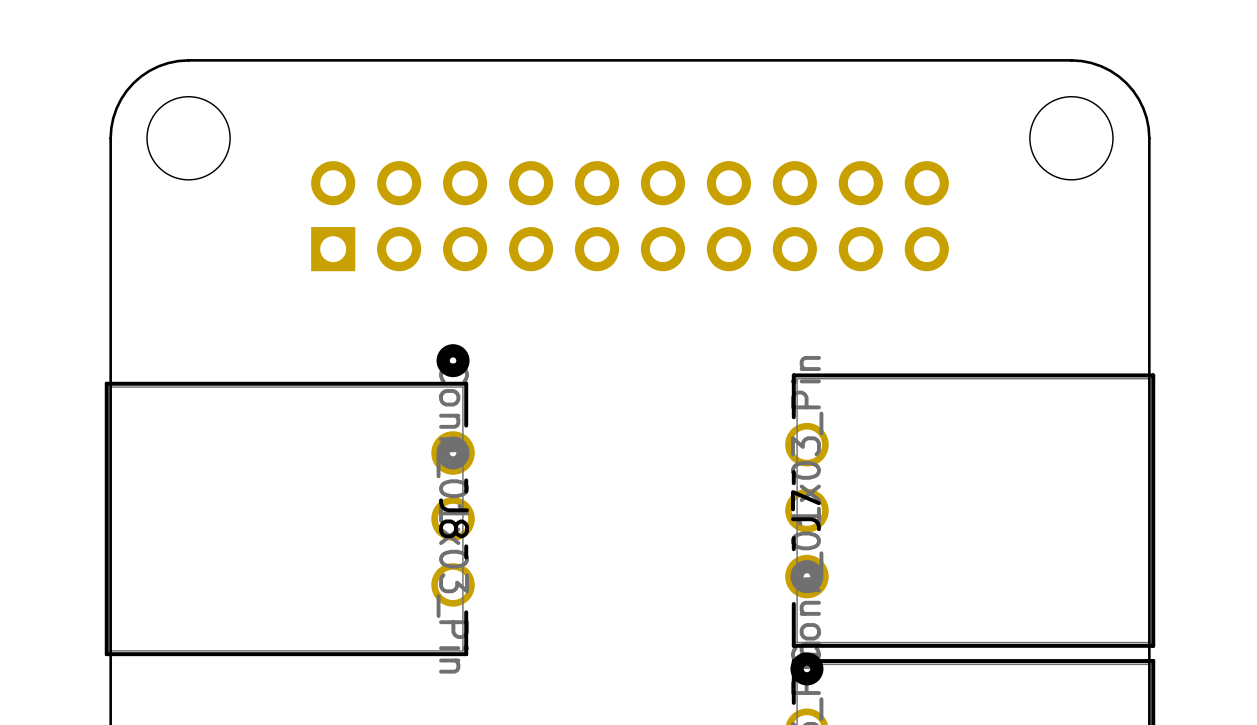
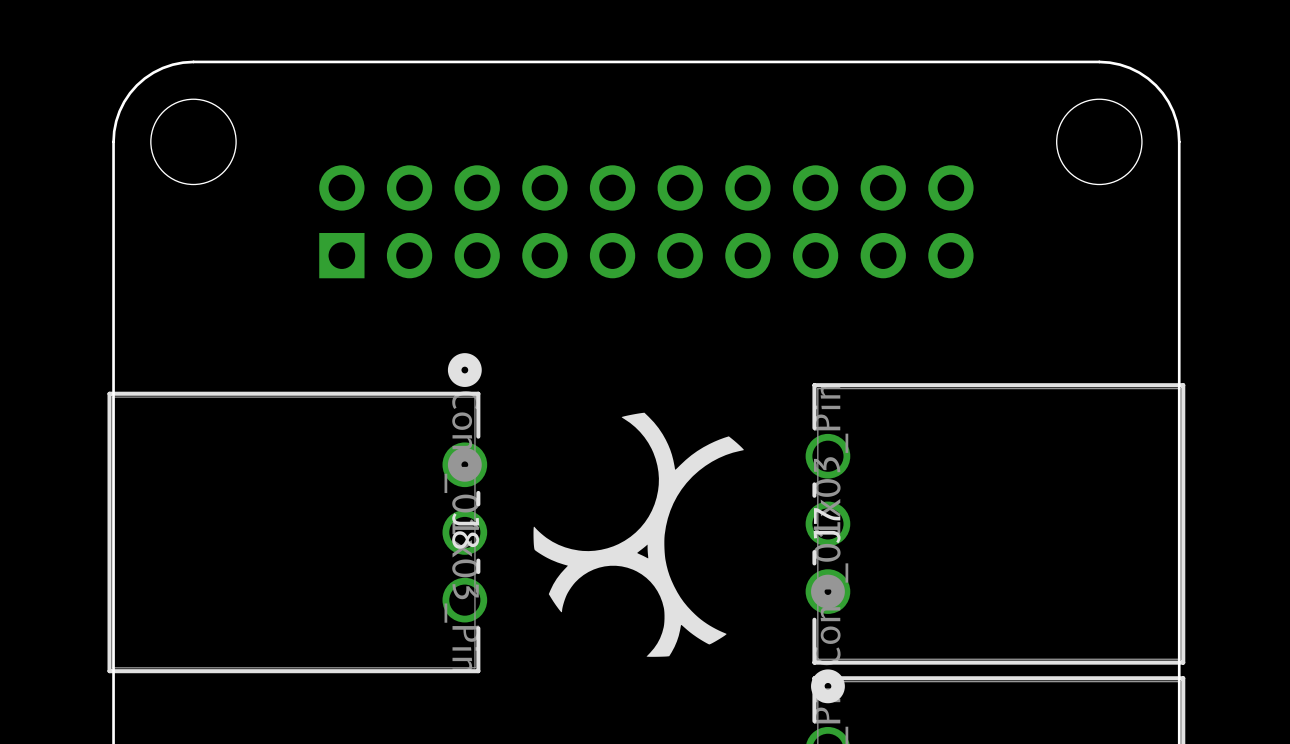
drawing: none -> [533, 412, 744, 657]

